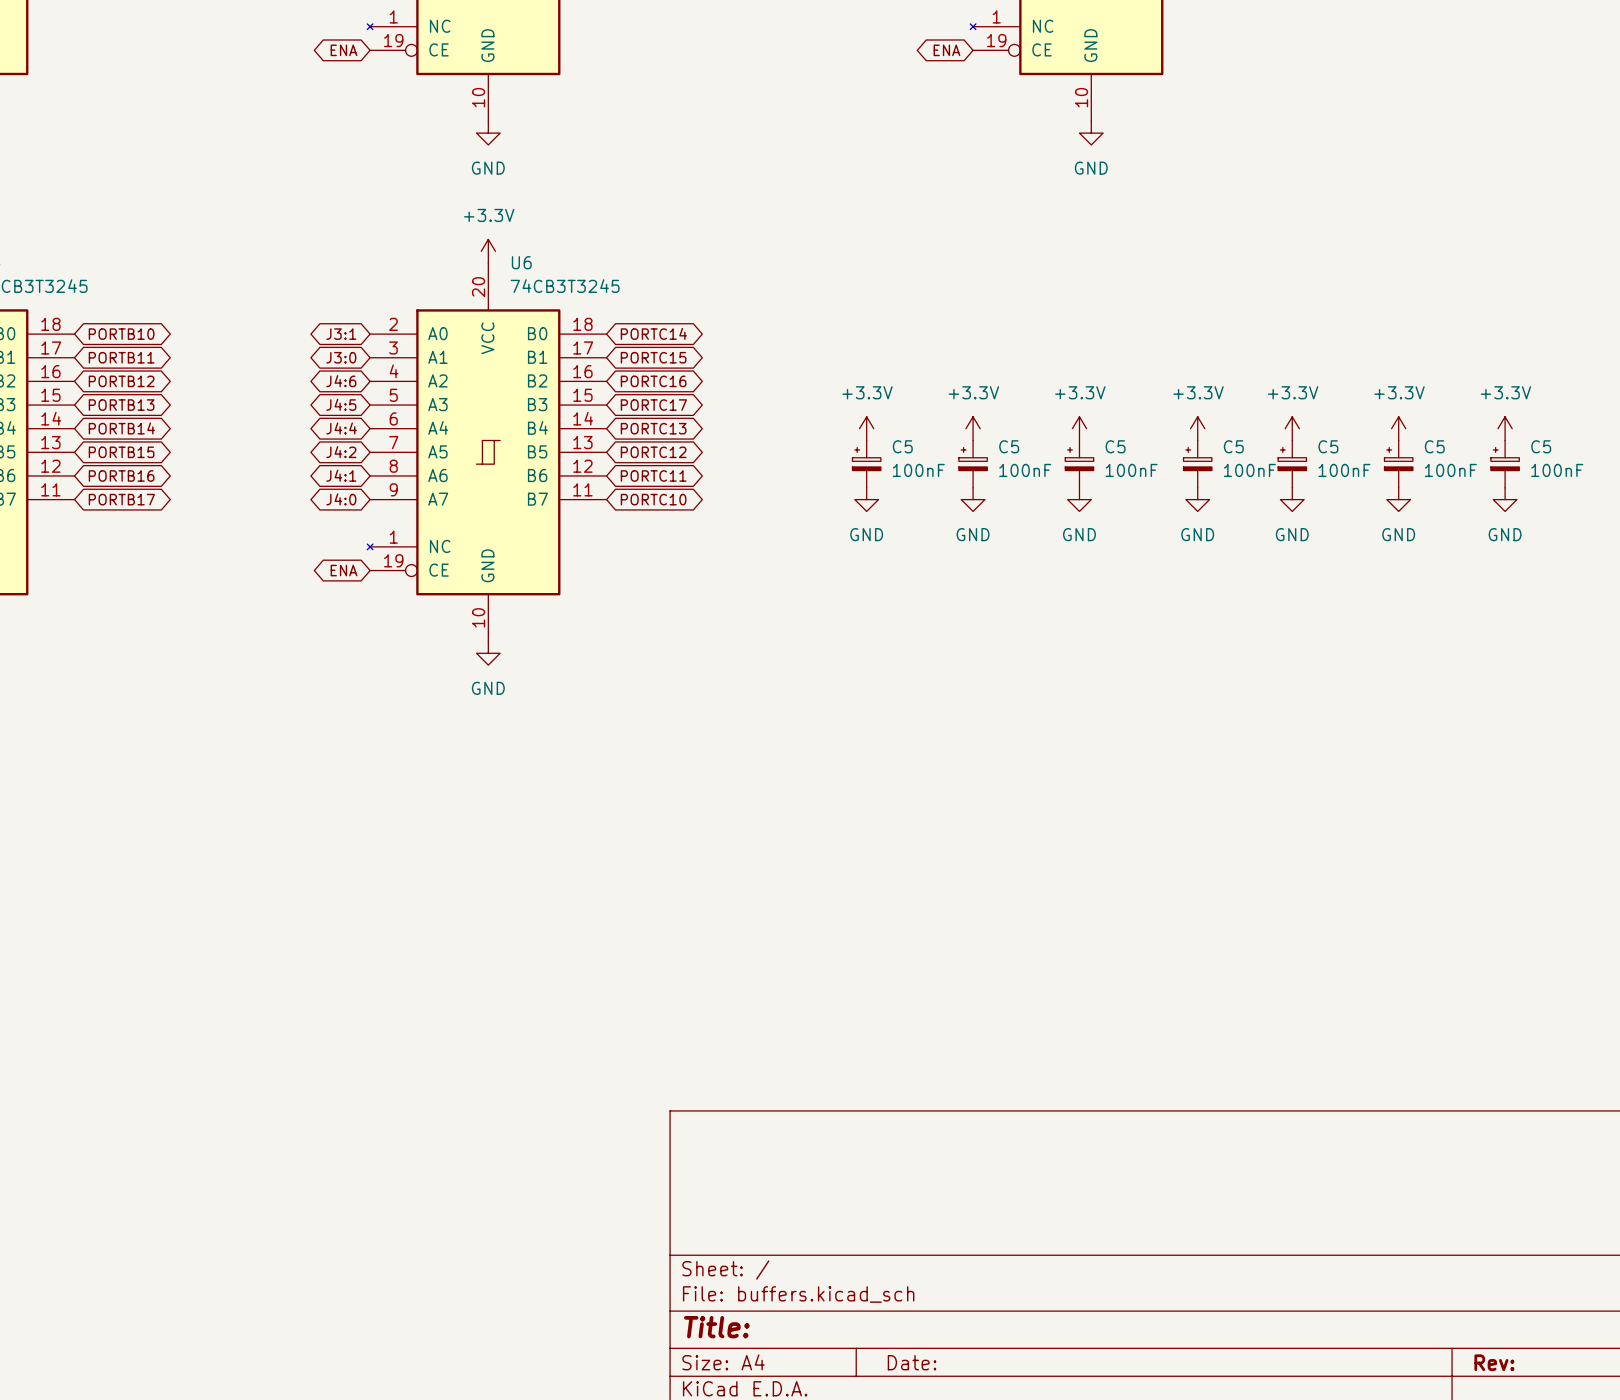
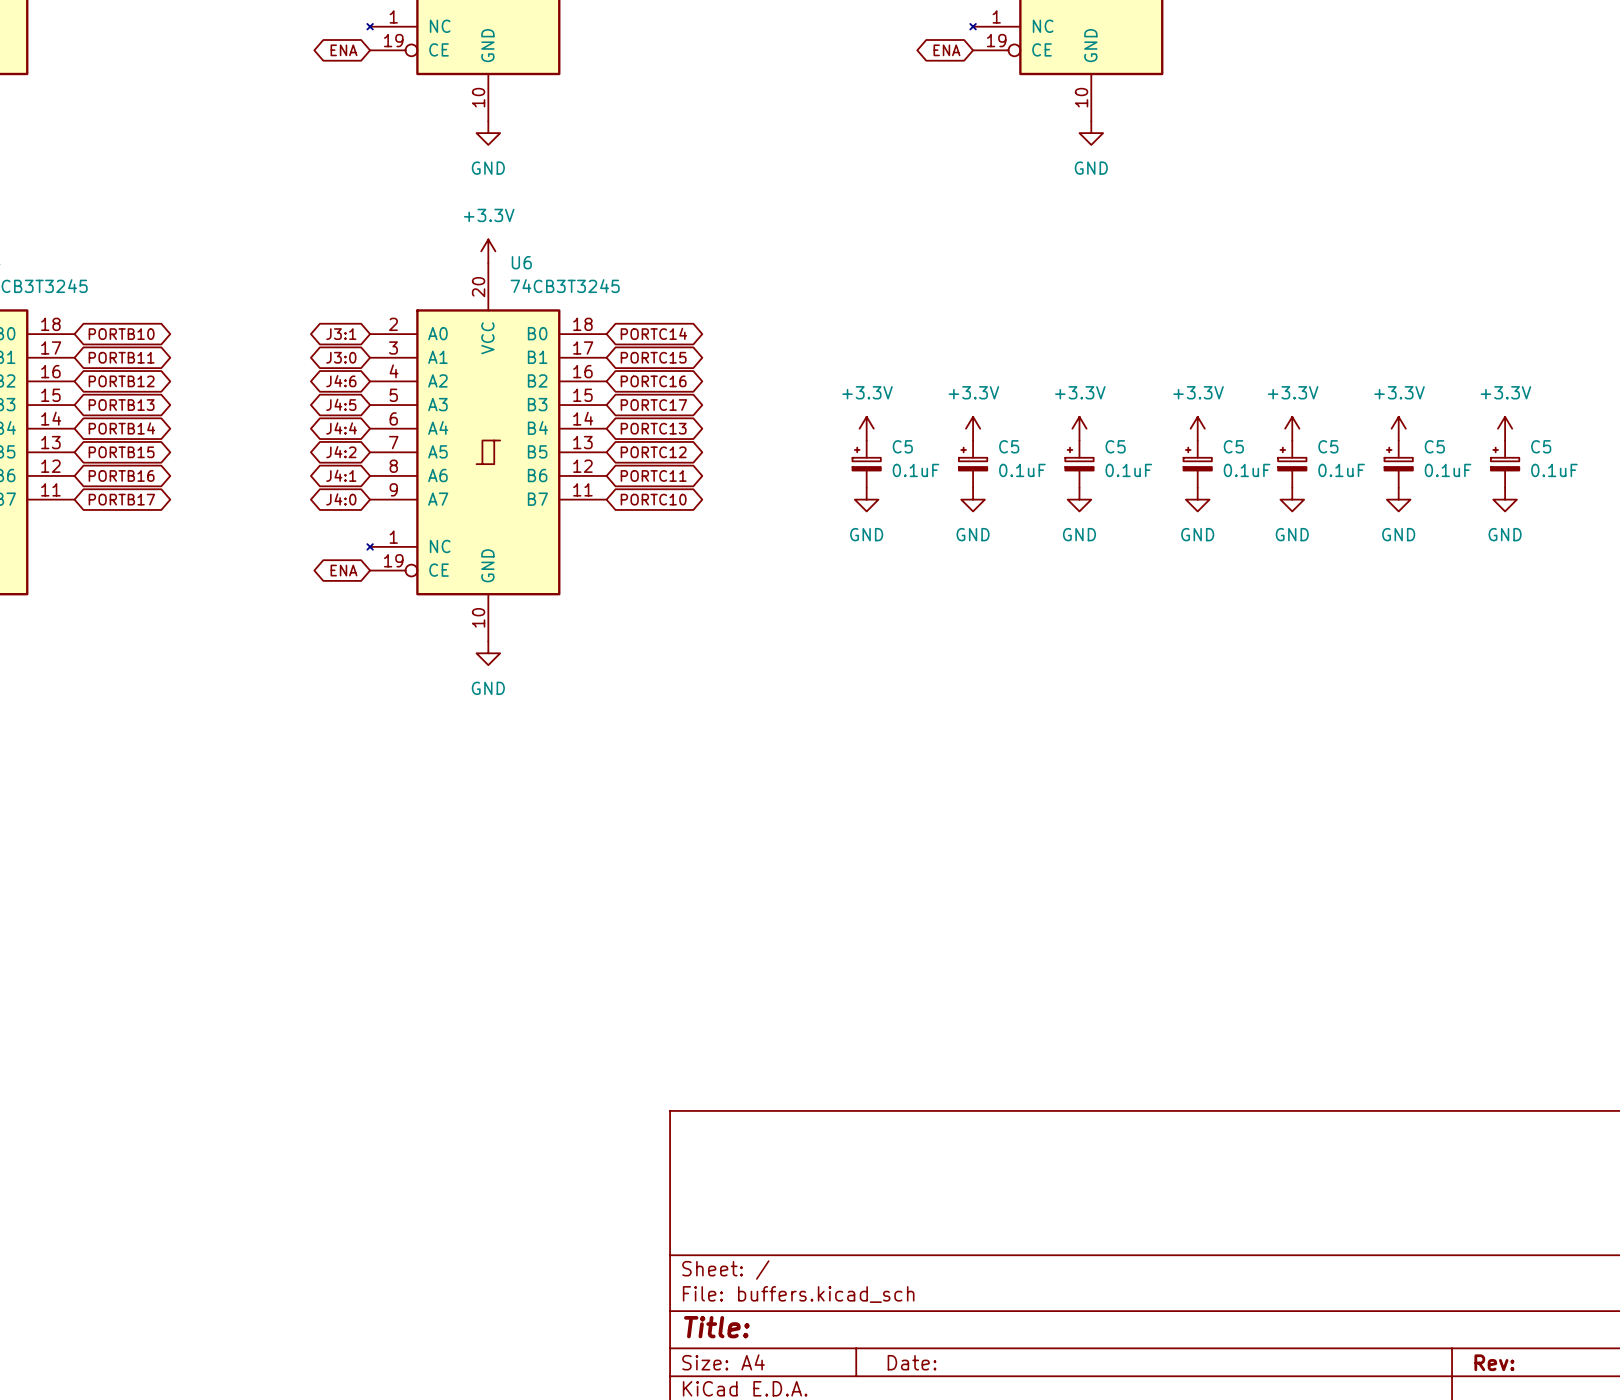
C5 value: 100nF (918, 470) -> 0.1uF (916, 470)
C5 value: 100nF (1025, 470) -> 0.1uF (1022, 470)
C5 value: 100nF (1131, 470) -> 0.1uF (1128, 470)
C5 value: 100nF (1249, 470) -> 0.1uF (1247, 470)
C5 value: 100nF (1344, 470) -> 0.1uF (1341, 470)
C5 value: 100nF (1450, 470) -> 0.1uF (1448, 470)
C5 value: 100nF (1557, 470) -> 0.1uF (1554, 470)

